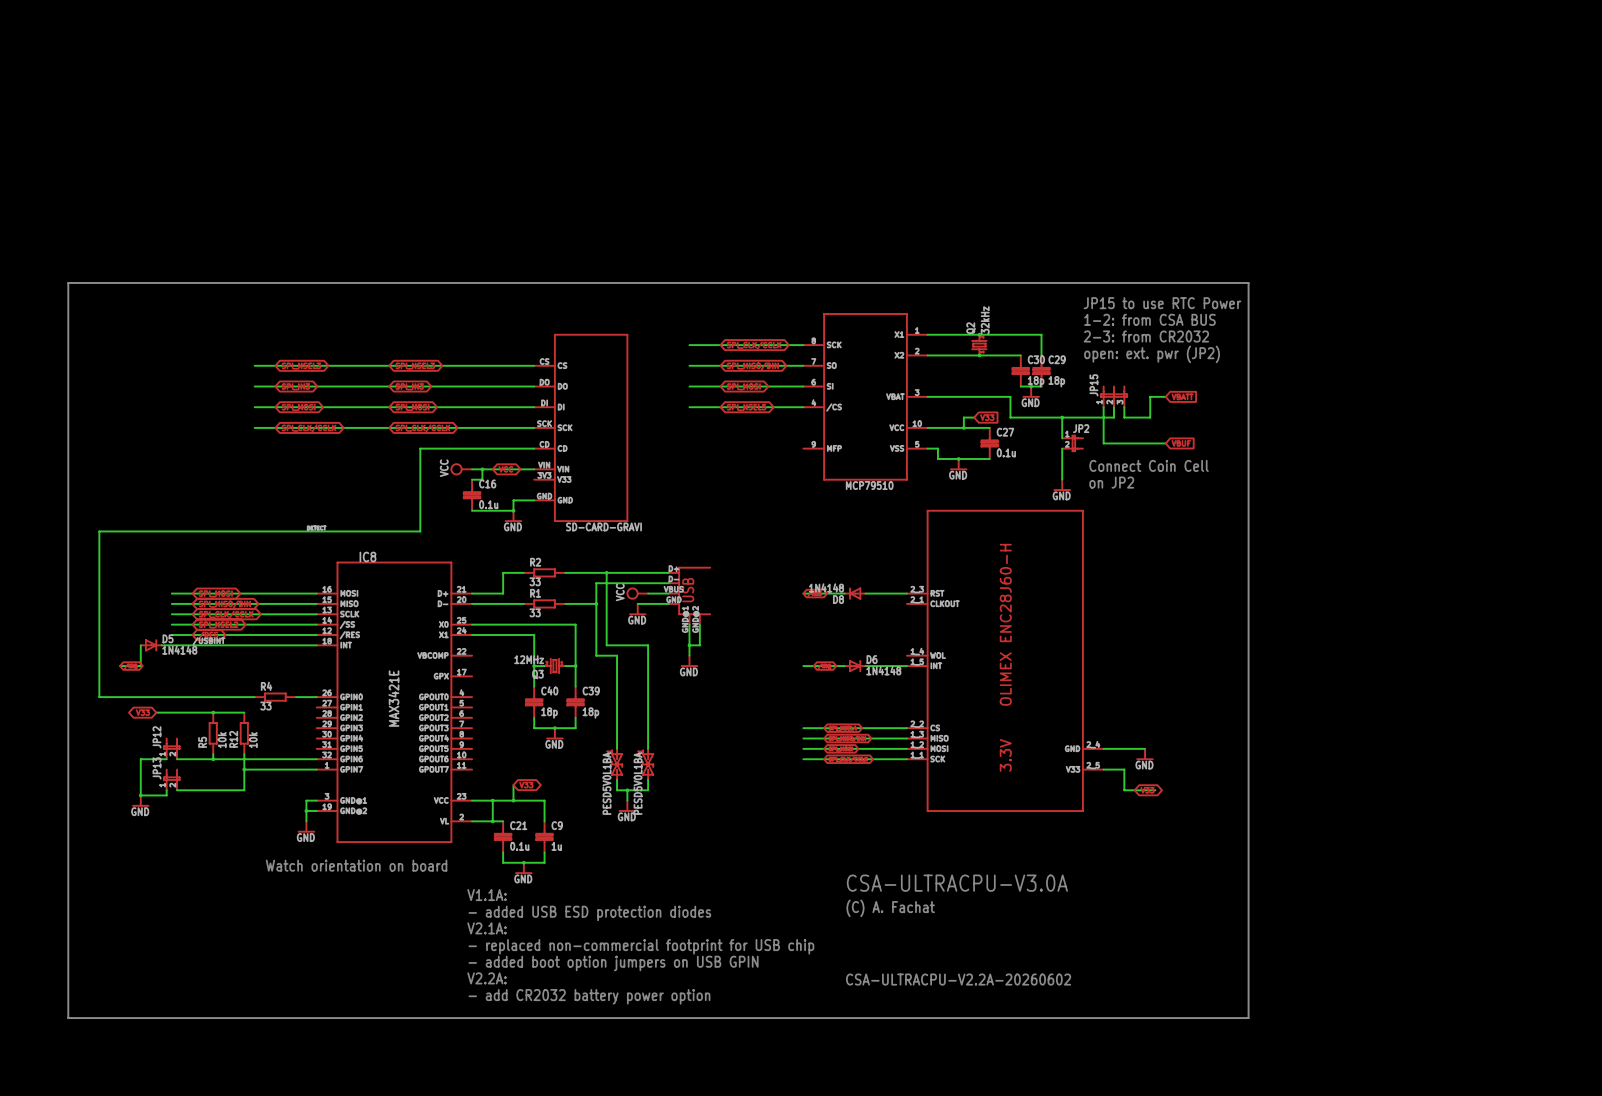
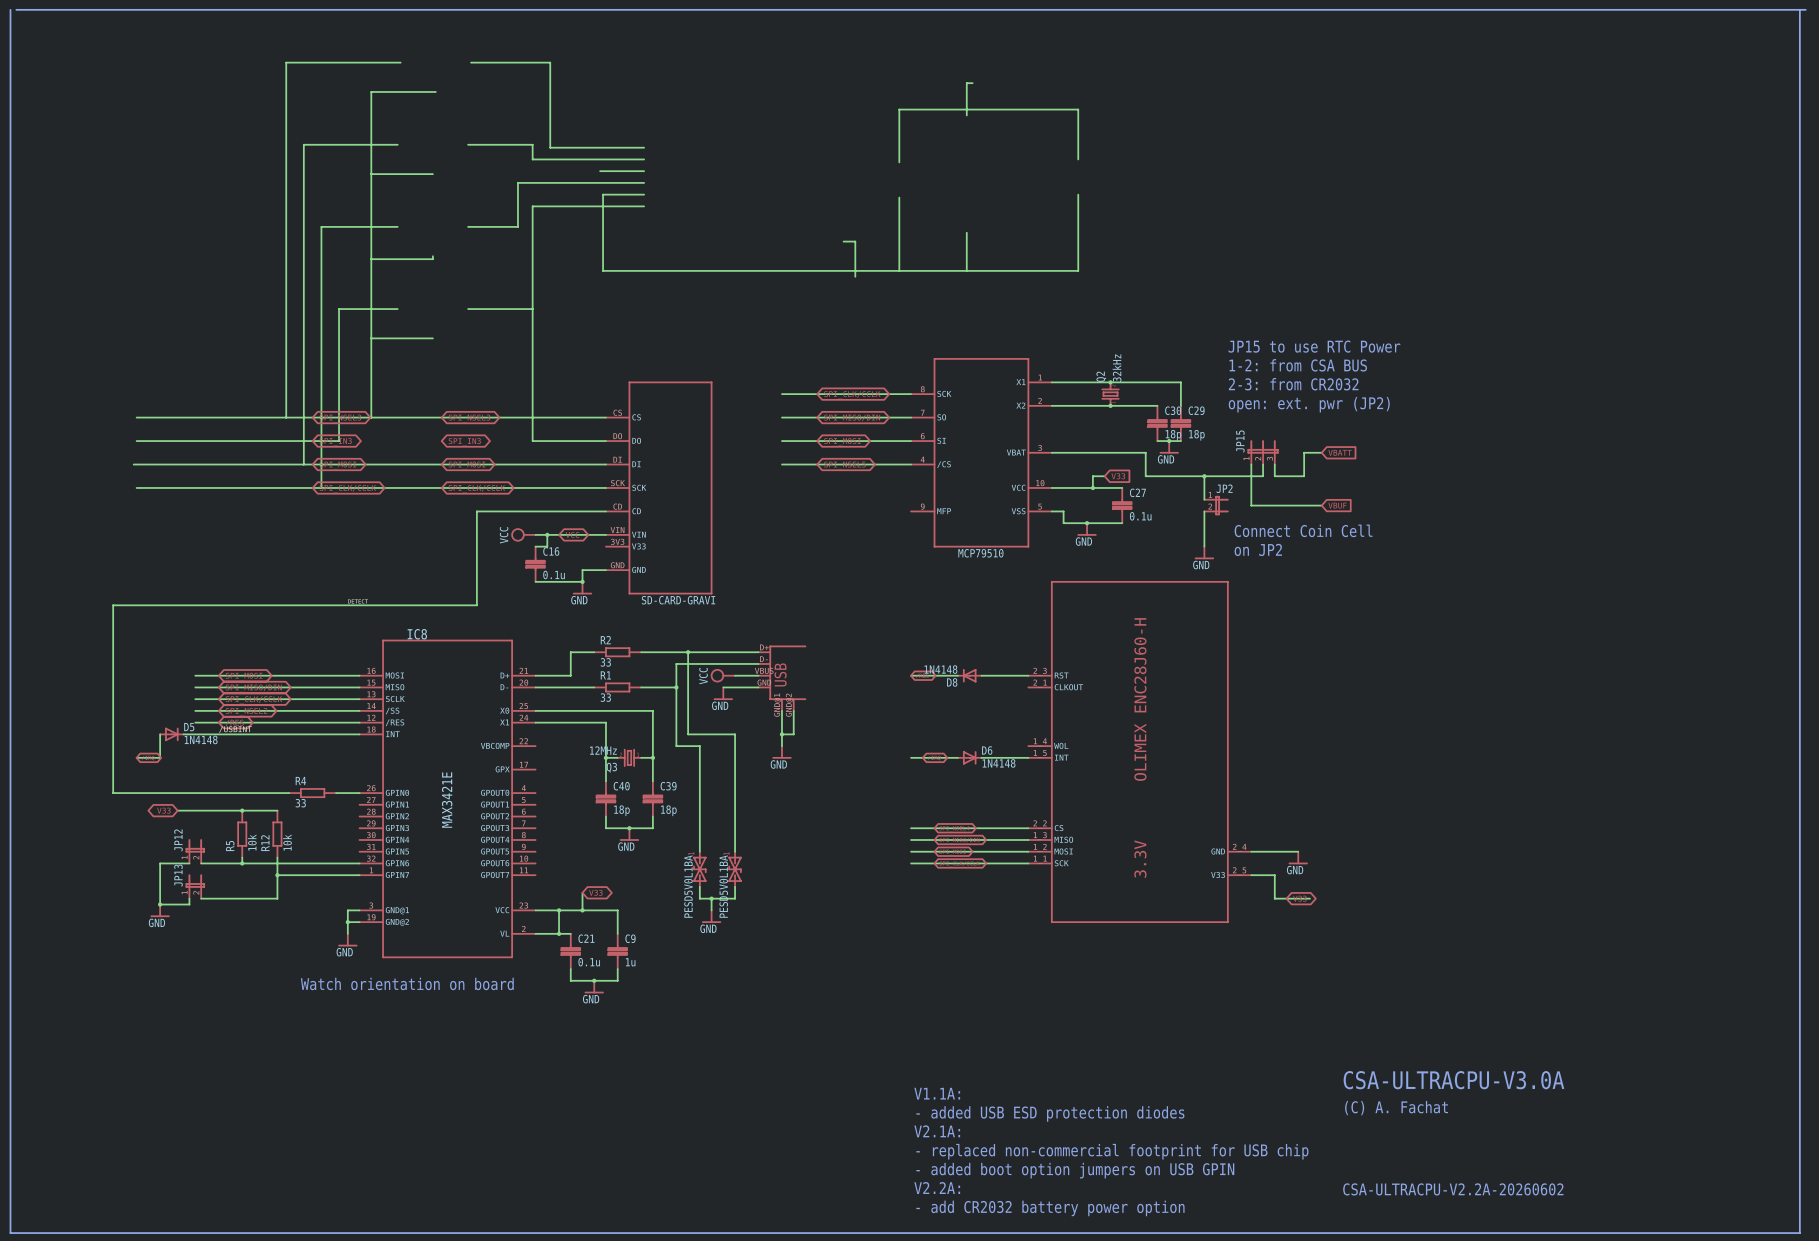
line: none -> (10, 9) (10, 1233) (1799, 1233) (1799, 9)
line: none -> (16, 9) (1805, 9)
wire: none -> (400, 62) (286, 62) (286, 417)
wire: none -> (471, 62) (550, 62) (550, 147) (644, 147)
wire: none -> (972, 83) (966, 83) (966, 115)
wire: none -> (435, 91) (371, 91) (371, 417)
wire: none -> (397, 144) (303, 144) (303, 464)
wire: none -> (468, 144) (532, 144) (532, 159) (644, 159)
wire: none -> (1078, 159) (1078, 109) (899, 109) (899, 162)
wire: none -> (600, 171) (644, 171)
wire: none -> (371, 174) (432, 174)
wire: none -> (644, 182) (517, 182) (517, 226) (468, 226)
wire: none -> (644, 194) (603, 194) (603, 270) (1078, 270) (1078, 194)
wire: none -> (899, 197) (899, 270)
wire: none -> (644, 206) (532, 206) (532, 441)
wire: none -> (397, 226) (321, 226) (321, 487)
wire: none -> (966, 232) (966, 270)
wire: none -> (843, 241) (855, 241) (855, 276)
wire: none -> (432, 256) (432, 259) (371, 259)
wire: none -> (468, 309) (532, 309)
line: (68, 282) (68, 1018) (1248, 1018) (1248, 282) (68, 282) -> none
wire: none -> (371, 338) (432, 338)
wire: none -> (136, 417) (289, 417)
wire: none -> (136, 441) (289, 441)
wire: (298, 386) (469, 386) -> (339, 441) (339, 309) (397, 309)
wire: none -> (133, 464) (289, 464)
wire: none -> (136, 487) (289, 487)
text: CSA-ULTRACPU-V3.0A (957, 883) -> none
text: V1.1A: (487, 895) -> none
text: (C) A. Fachat (890, 908) -> none
text: - added USB ESD protection diodes (589, 913) -> none
text: V2.1A: (487, 928) -> none
text: - replaced non-commercial footprint for USB chip (641, 946) -> none
text: none -> CSA-ULTRACPU-V3.0A (1453, 1080)
text: none -> V1.1A: (937, 1093)
text: - added boot option jumpers on USB GPIN (613, 963) -> none
text: none -> (C) A. Fachat (1396, 1108)
text: V2.2A: (487, 978) -> none
text: CSA-ULTRACPU-V2.2A-20260602 (958, 979) -> none
text: none -> - added USB ESD protection diodes (1050, 1113)
text: none -> V2.1A: (937, 1131)
text: - add CR2032 battery power option (589, 996) -> none
text: none -> - replaced non-commercial footprint for USB chip (1112, 1151)
text: none -> - added boot option jumpers on USB GPIN (1075, 1170)
text: none -> V2.2A: (937, 1188)
text: none -> CSA-ULTRACPU-V2.2A-20260602 (1453, 1189)
text: none -> - add CR2032 battery power option (1050, 1208)

